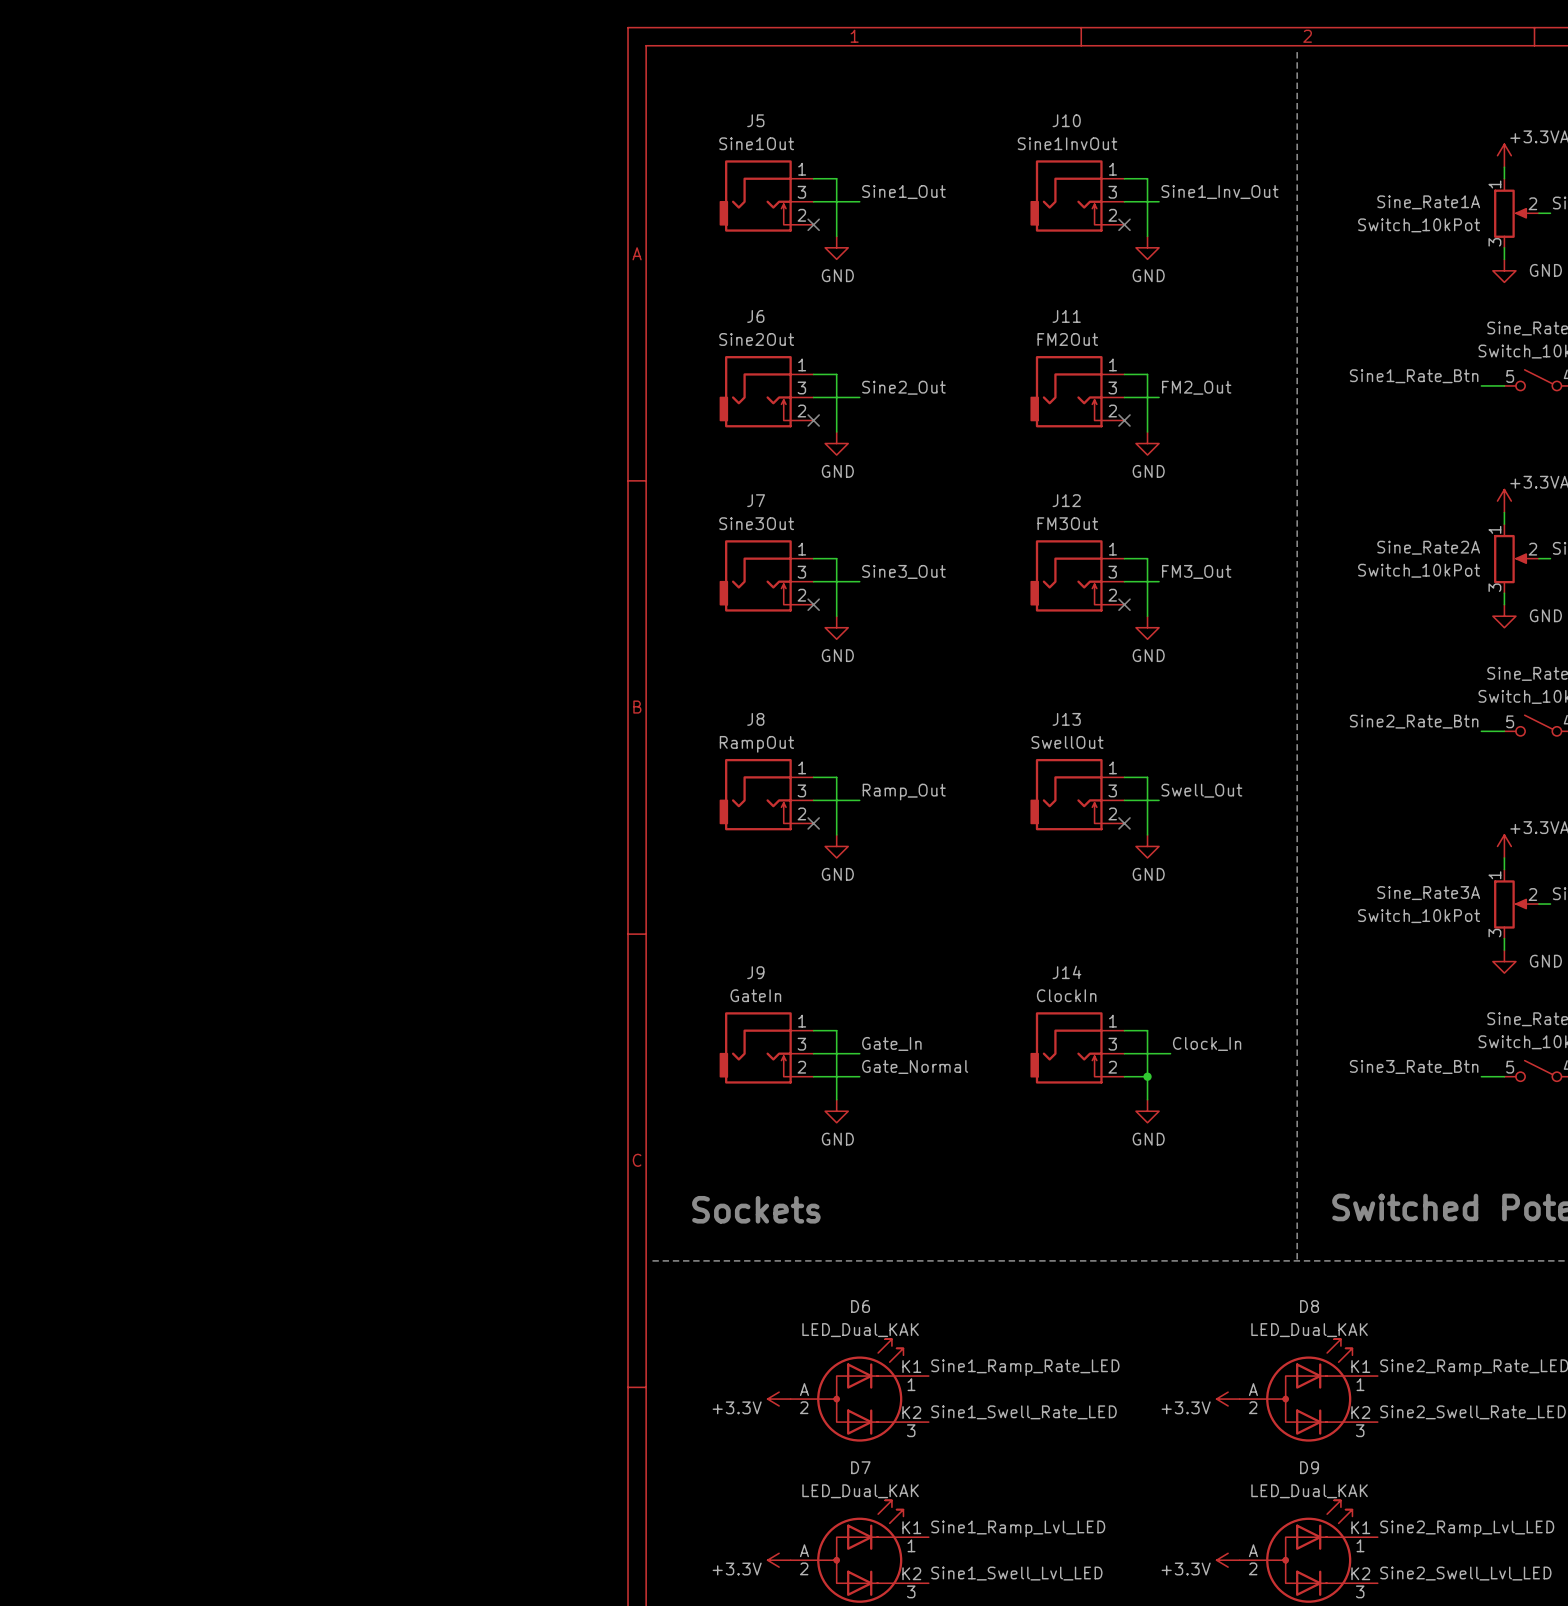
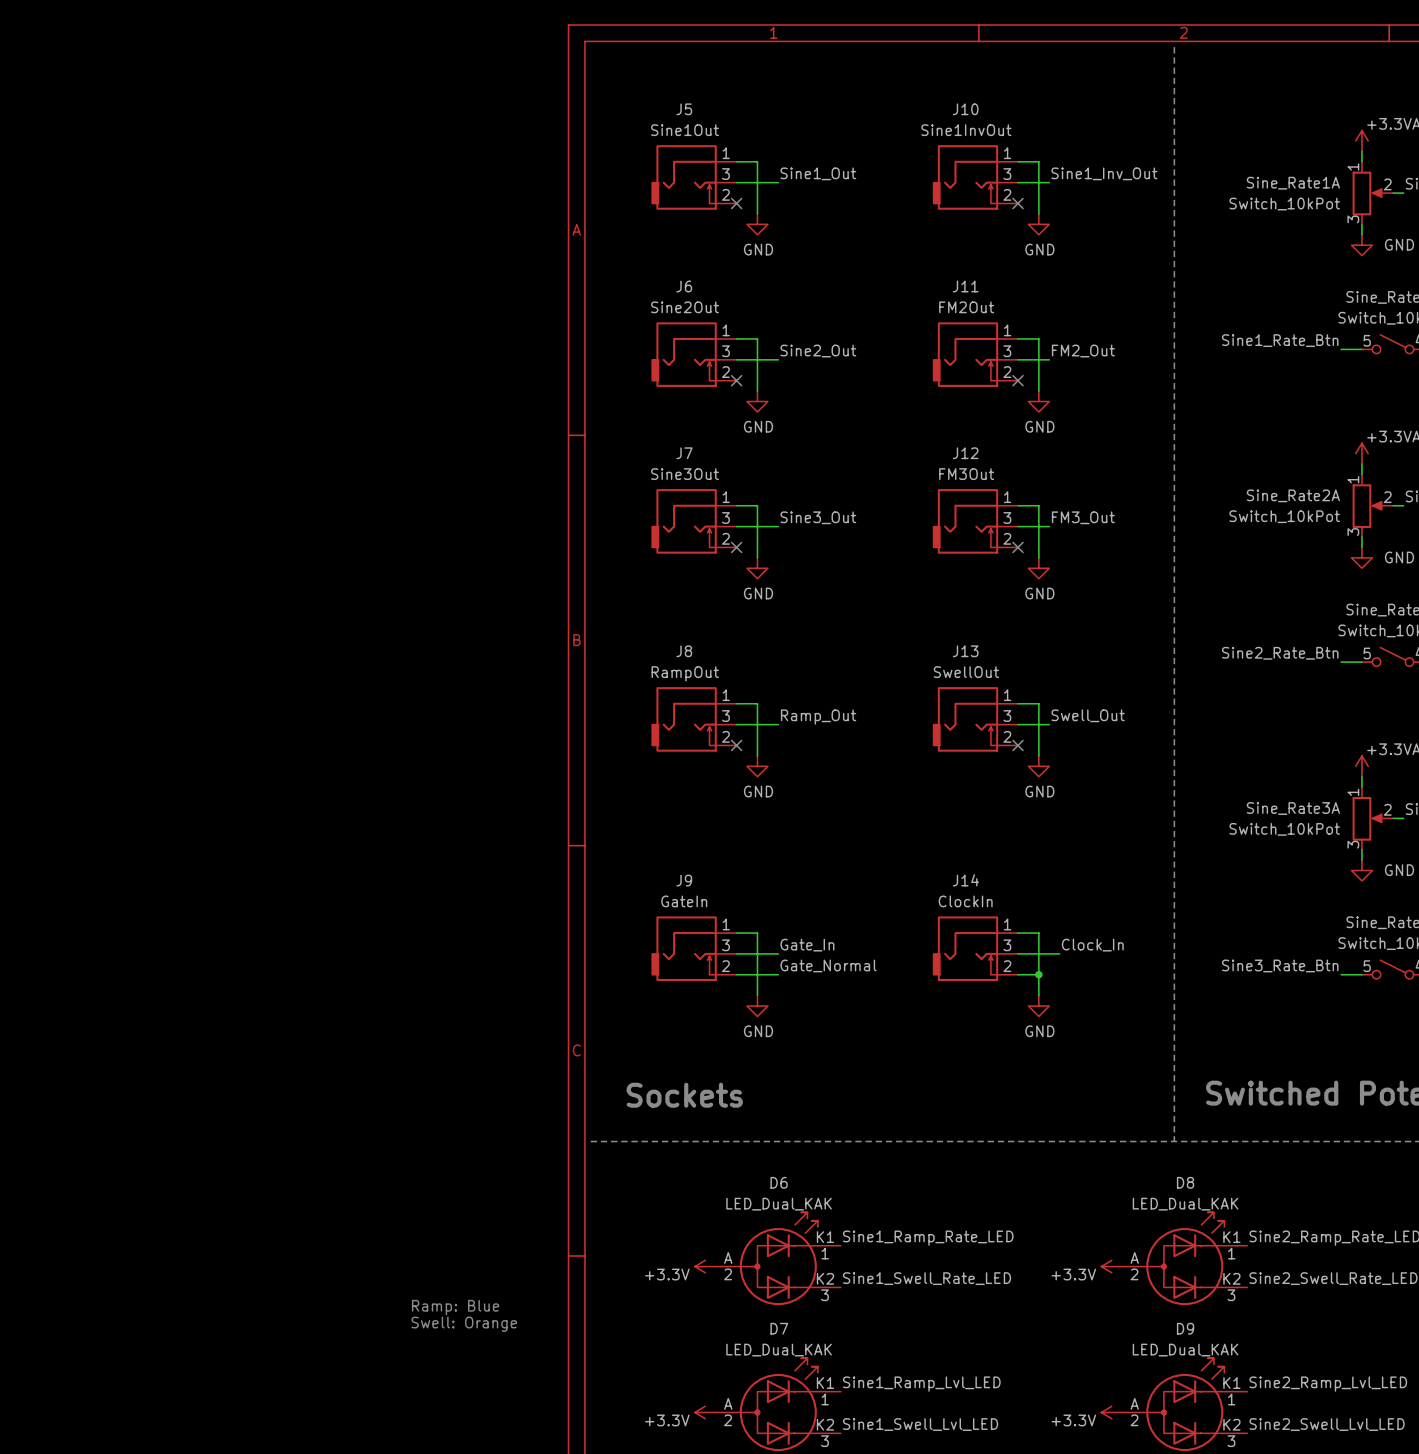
text: none -> Ramp: Blue (455, 1307)
text: none -> Swell: Orange (464, 1324)

